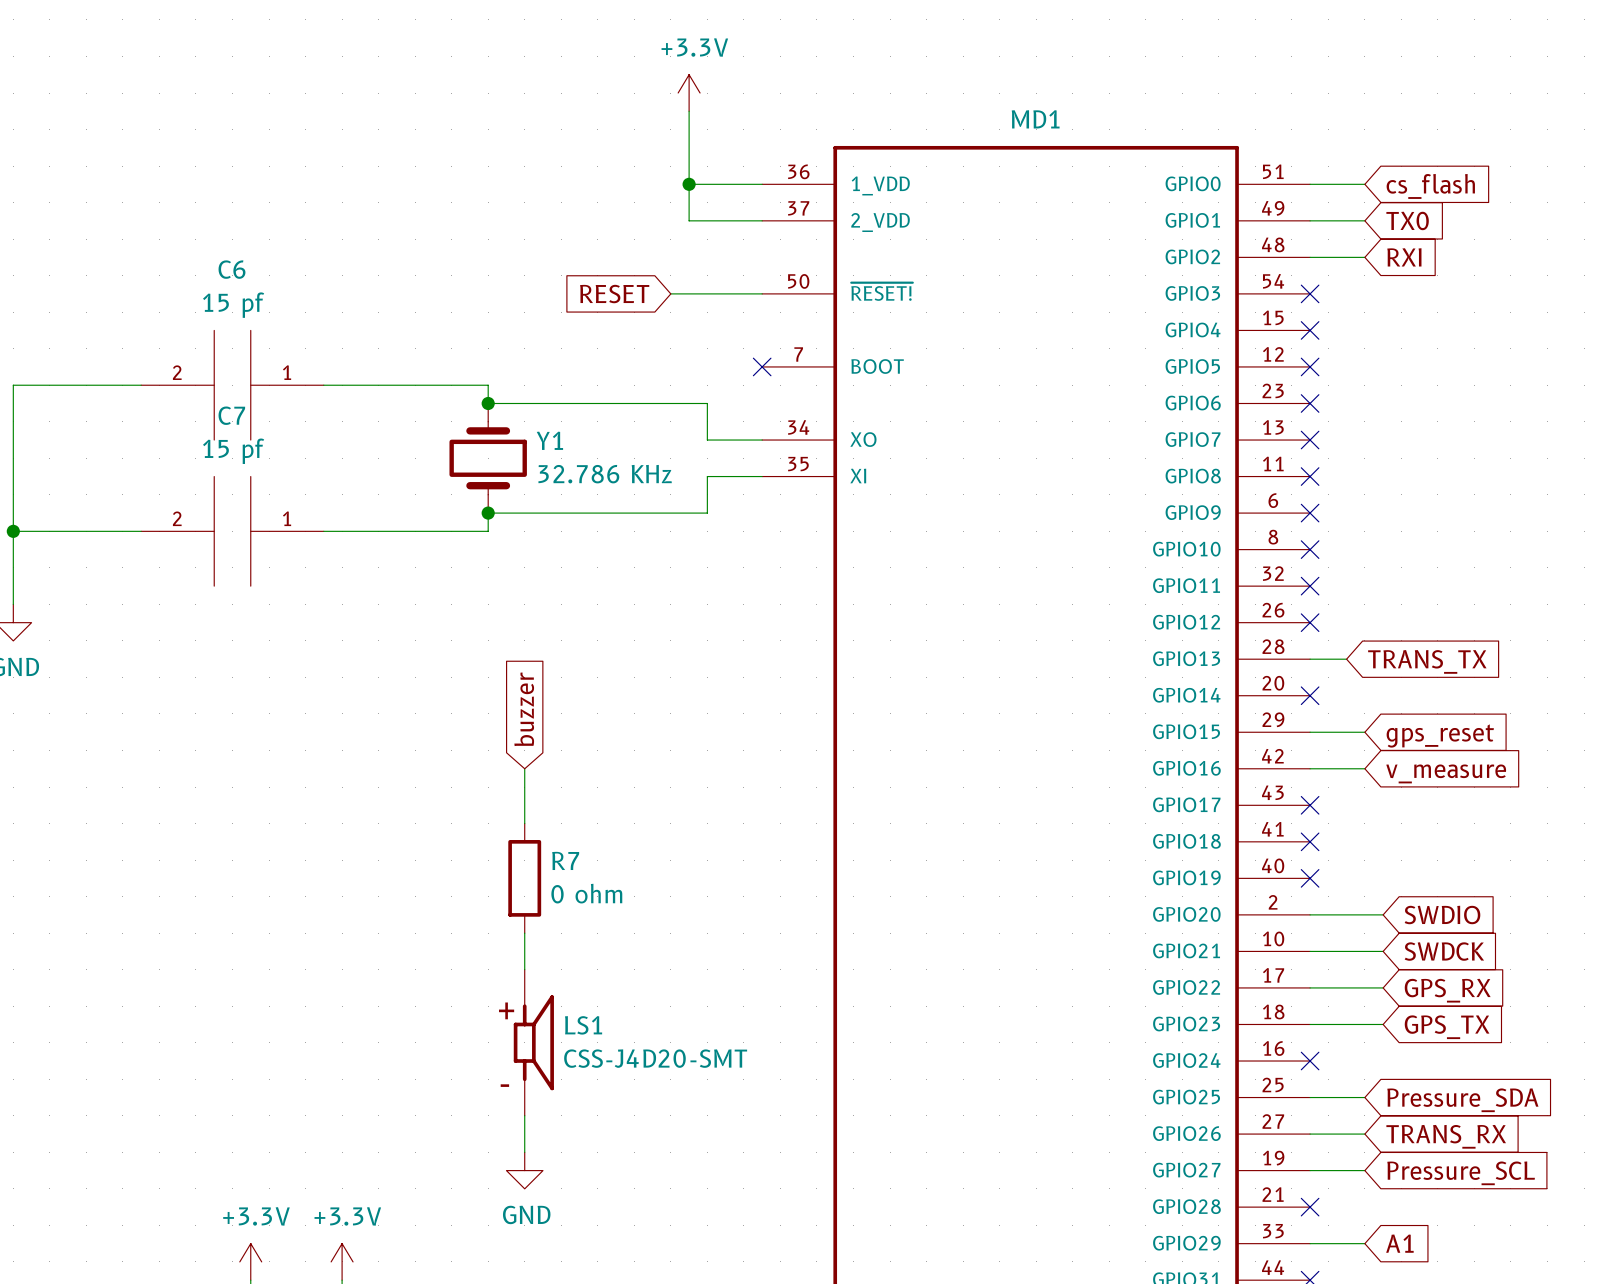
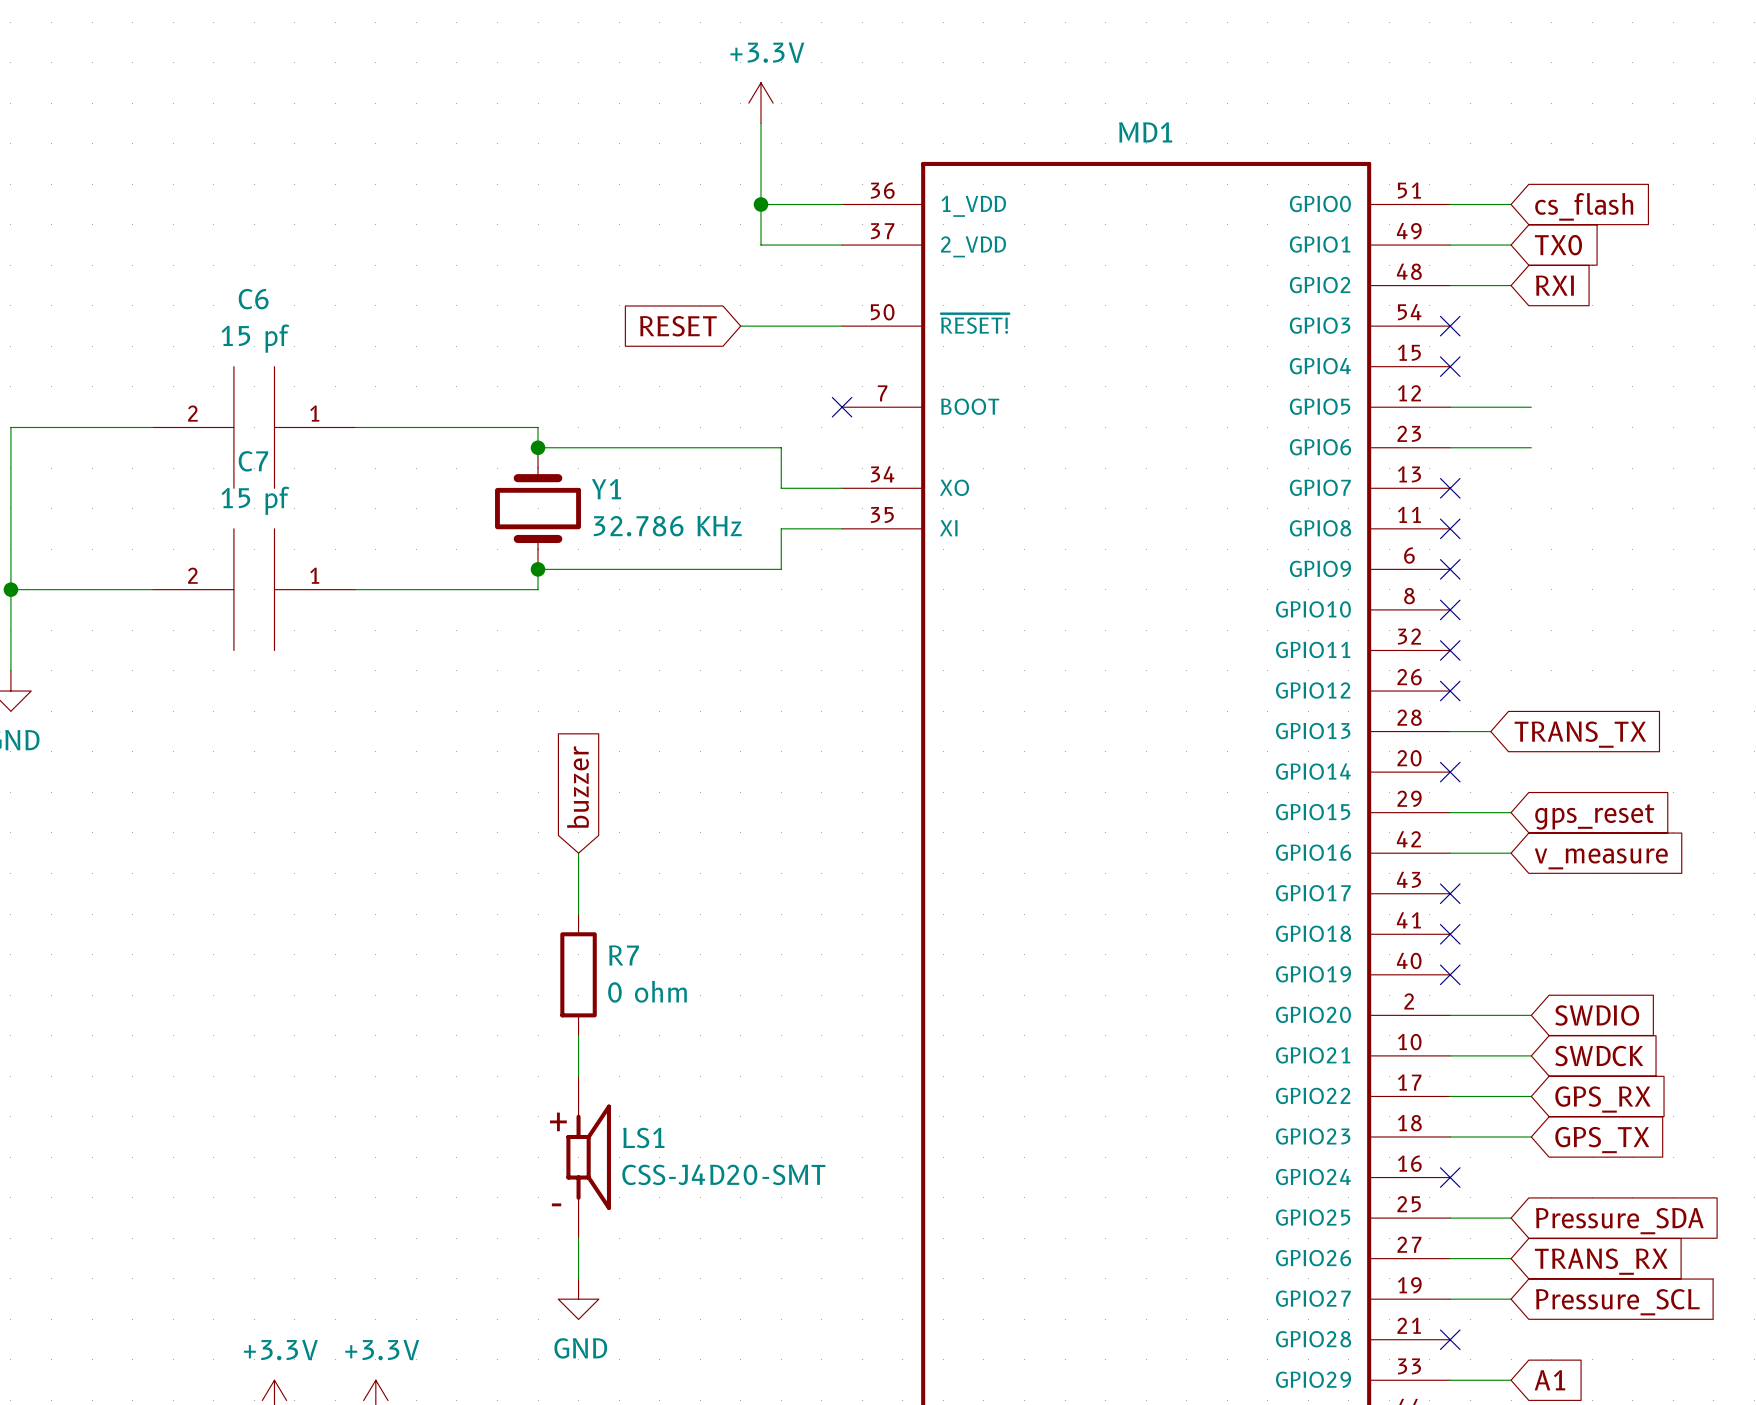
wire: none -> (1450, 407) (1531, 407)
no-connect mark: (1310, 366) -> none
wire: none -> (1450, 447) (1531, 447)
no-connect mark: (1310, 403) -> none

